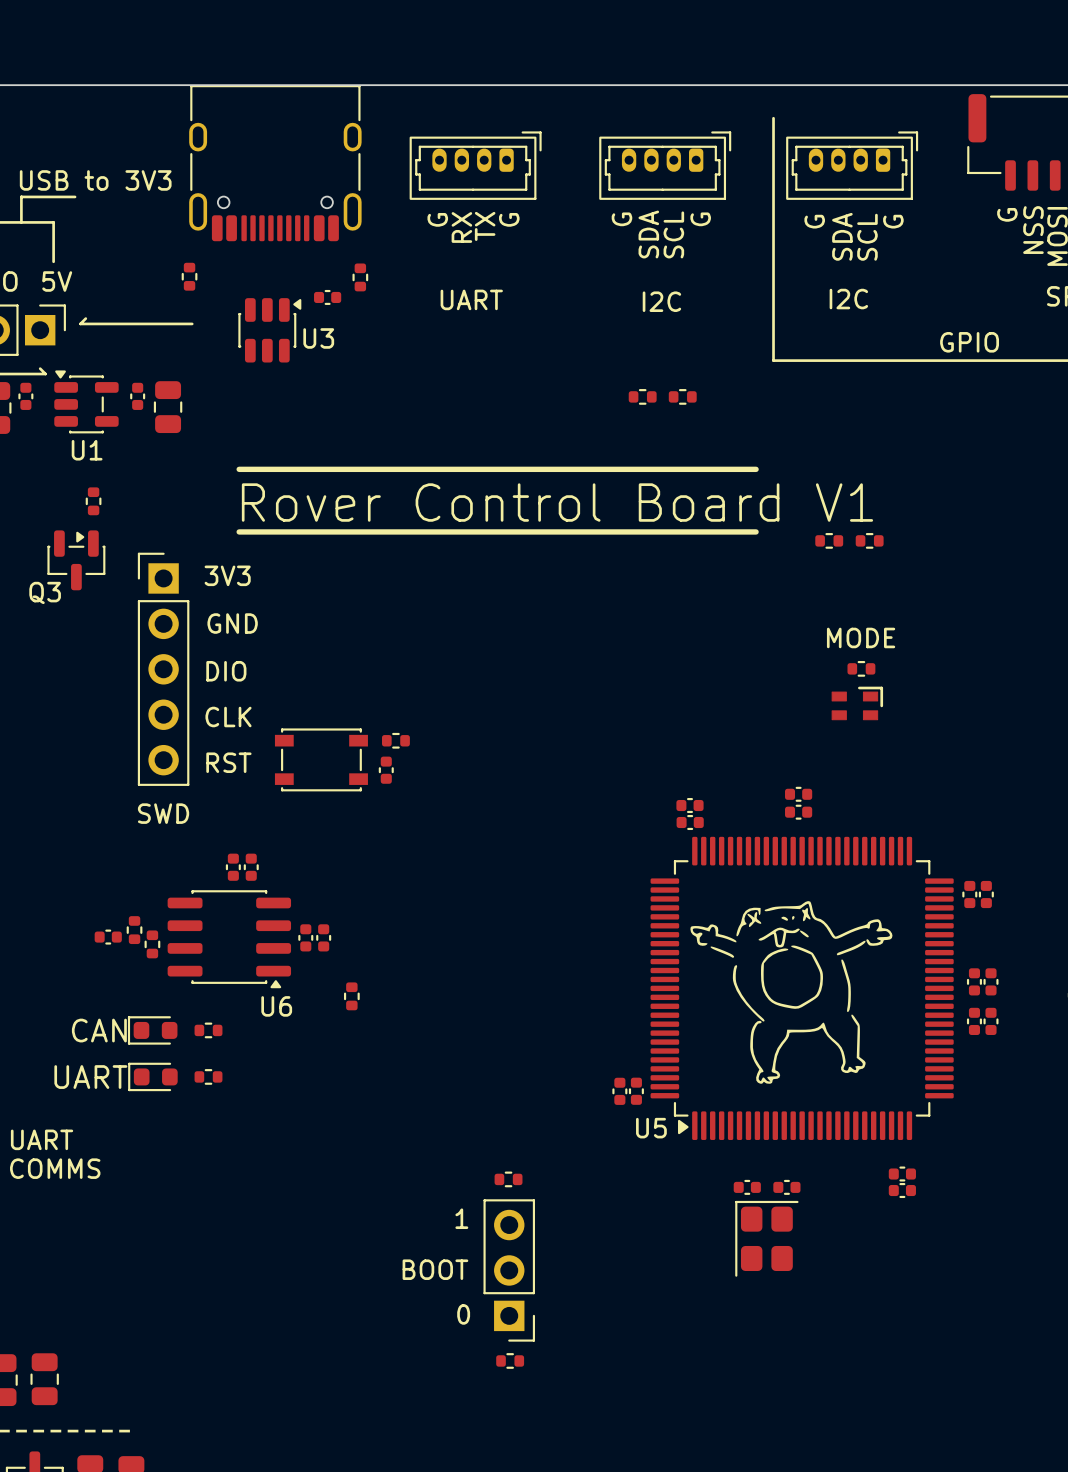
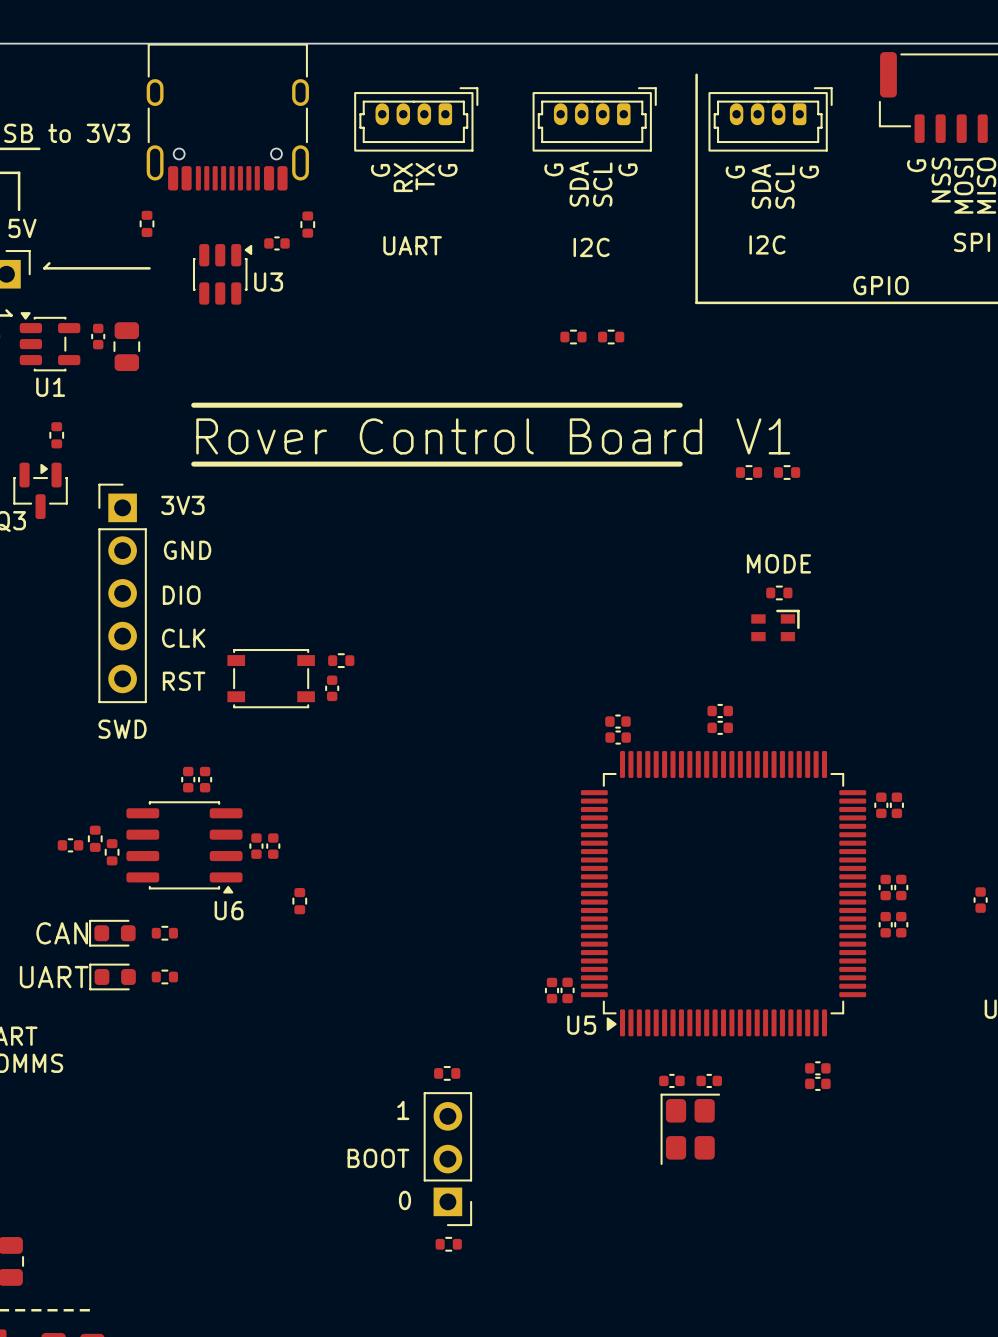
drawing: [690, 901, 893, 1084] -> none

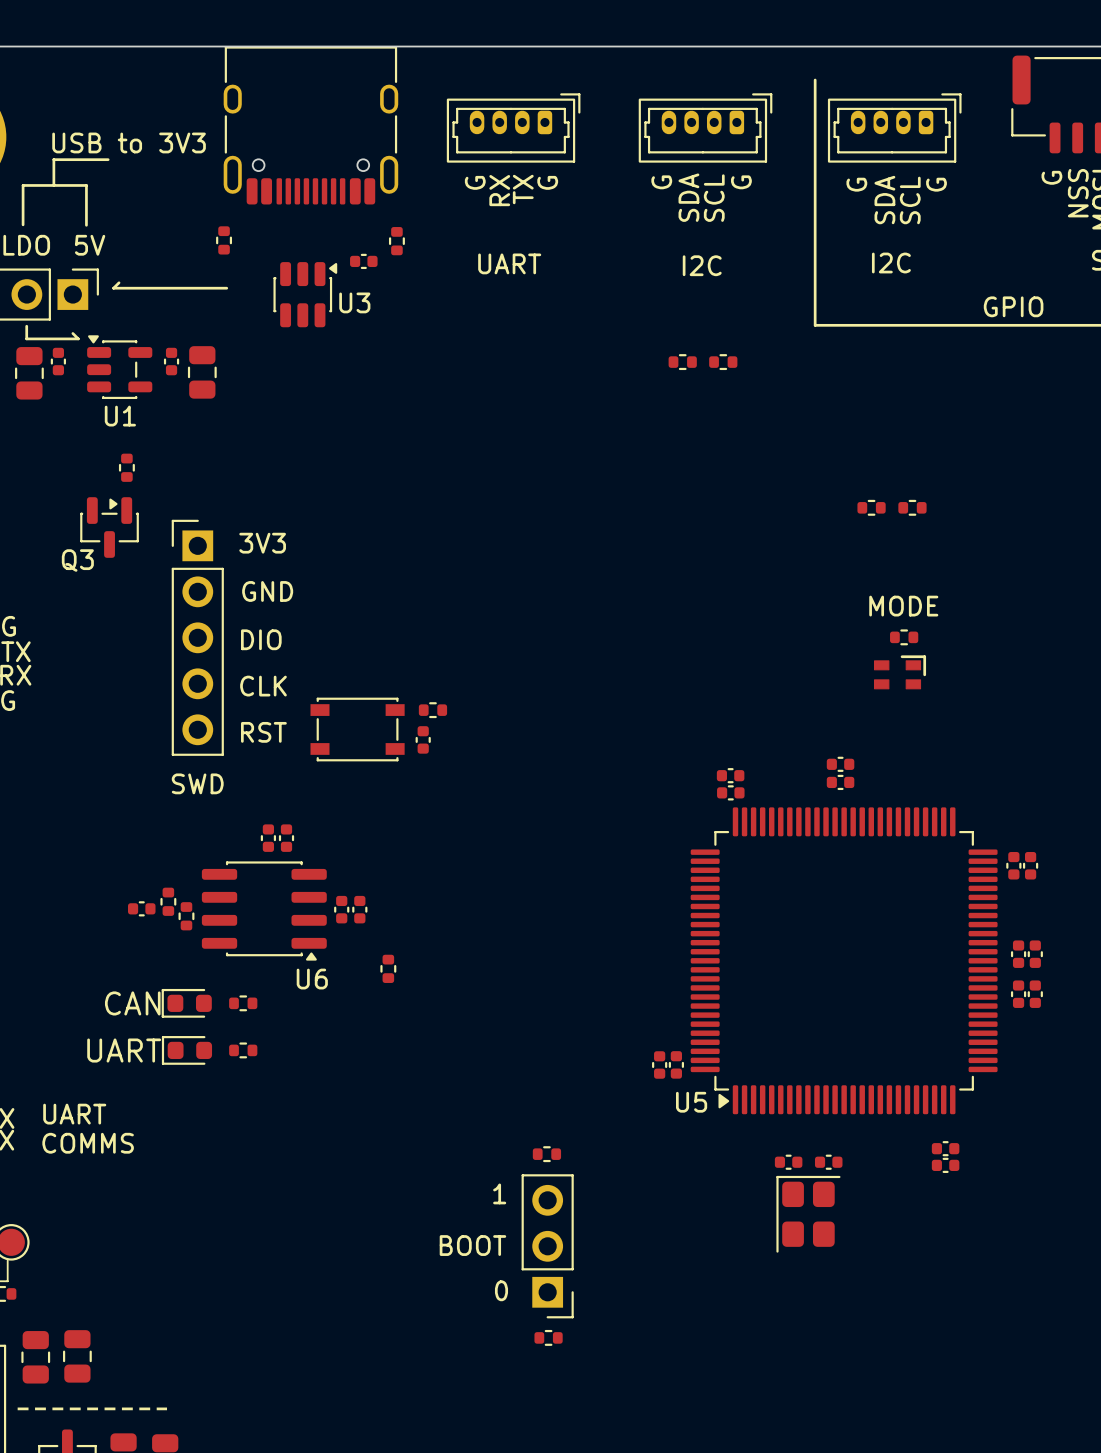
line: (193, 405) (680, 405) -> none
text: Rover Control Board V1 (493, 436) -> none
line: (193, 464) (680, 464) -> none

